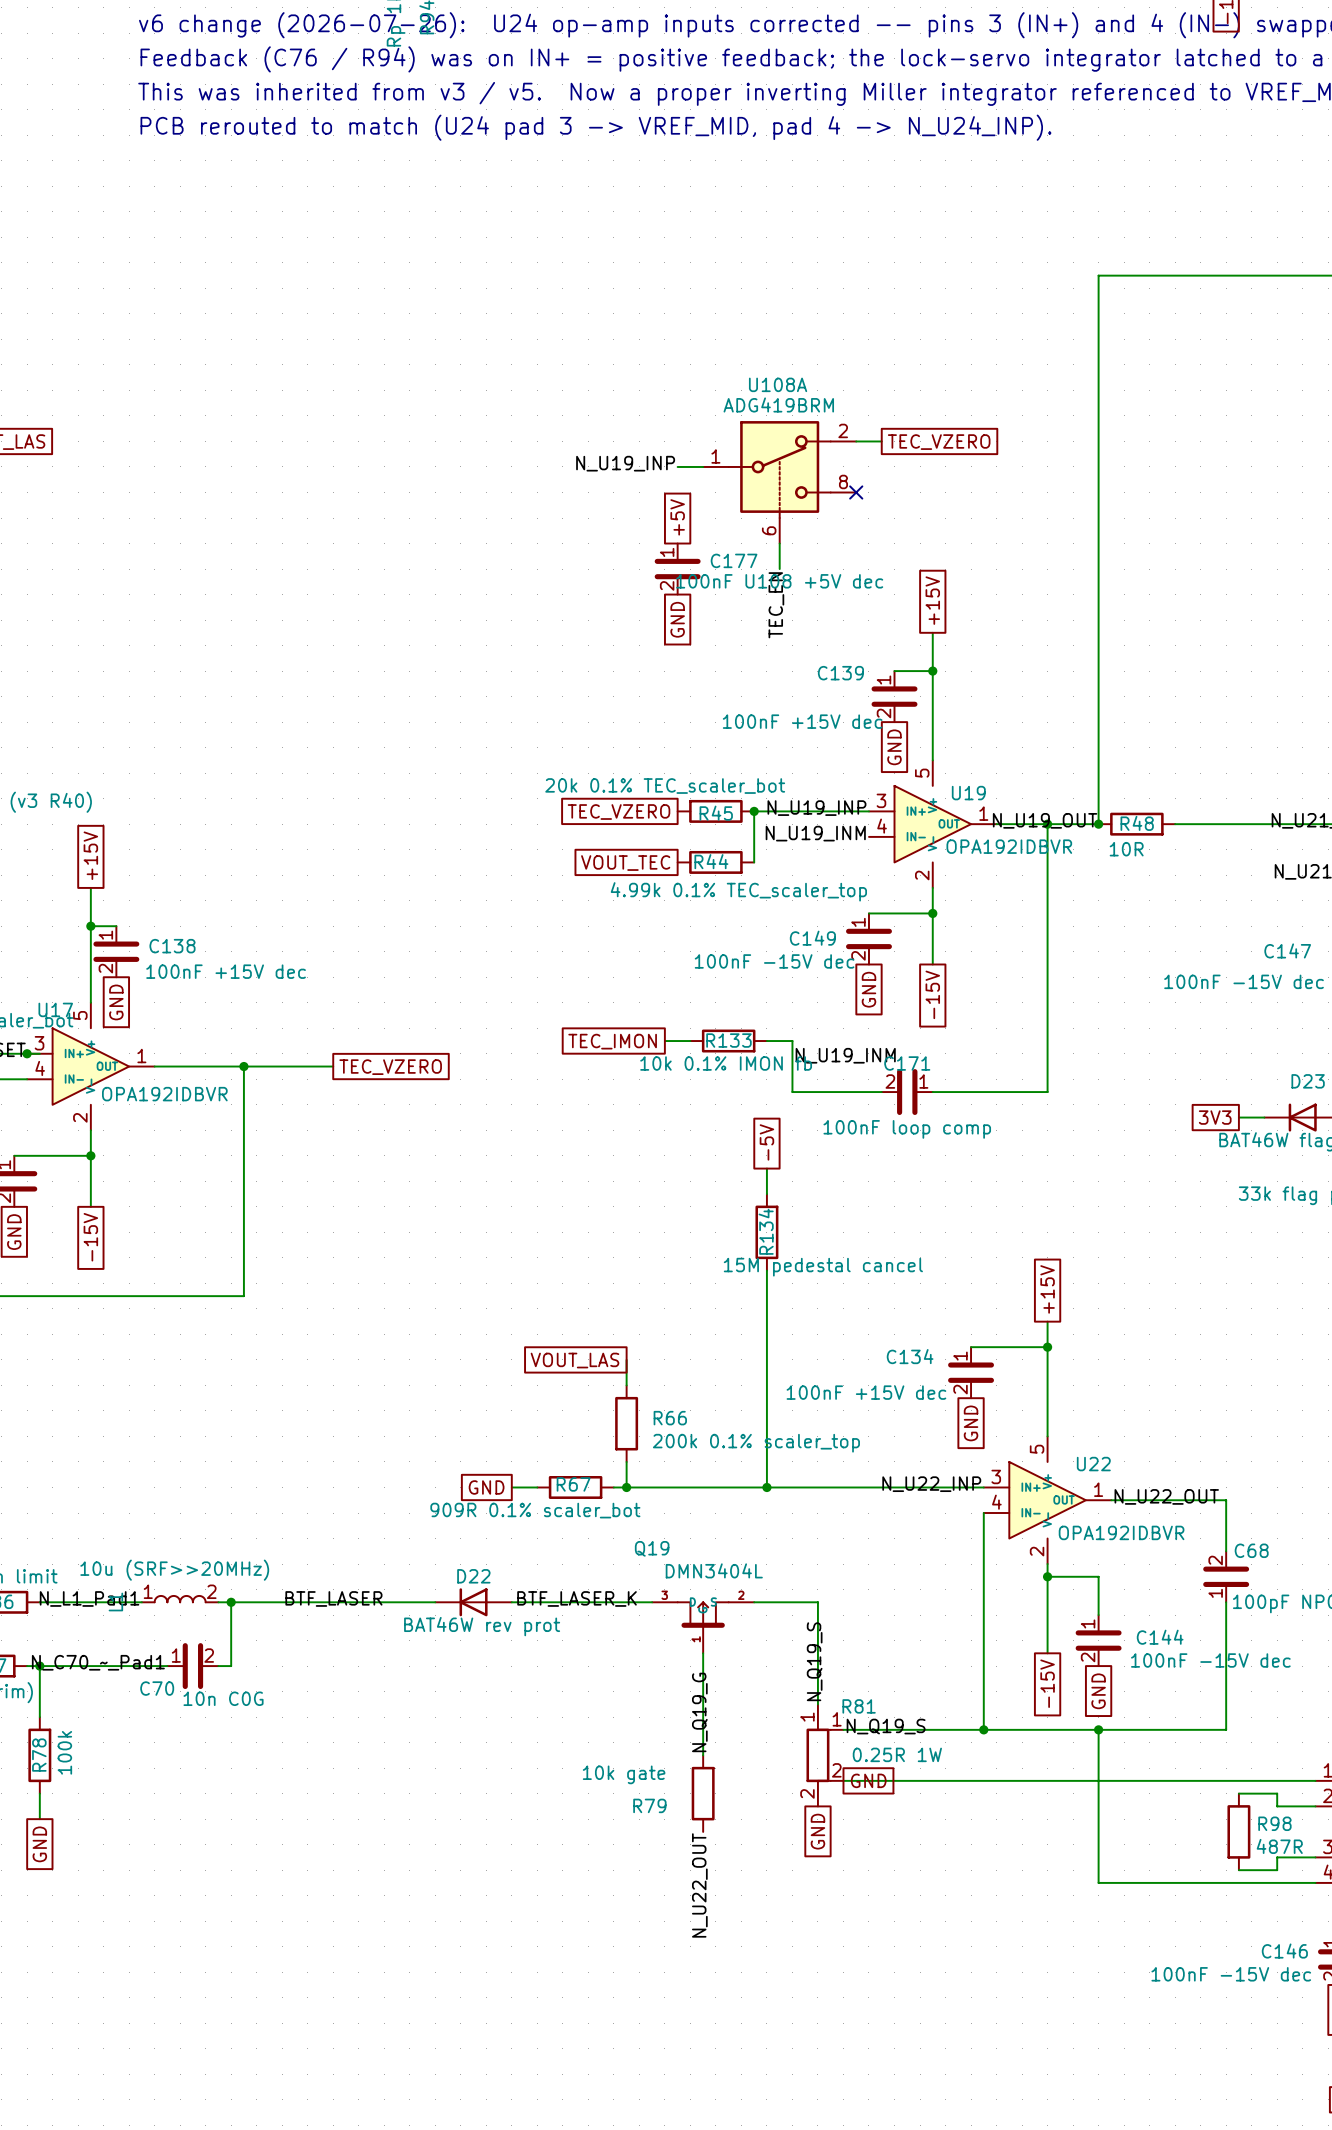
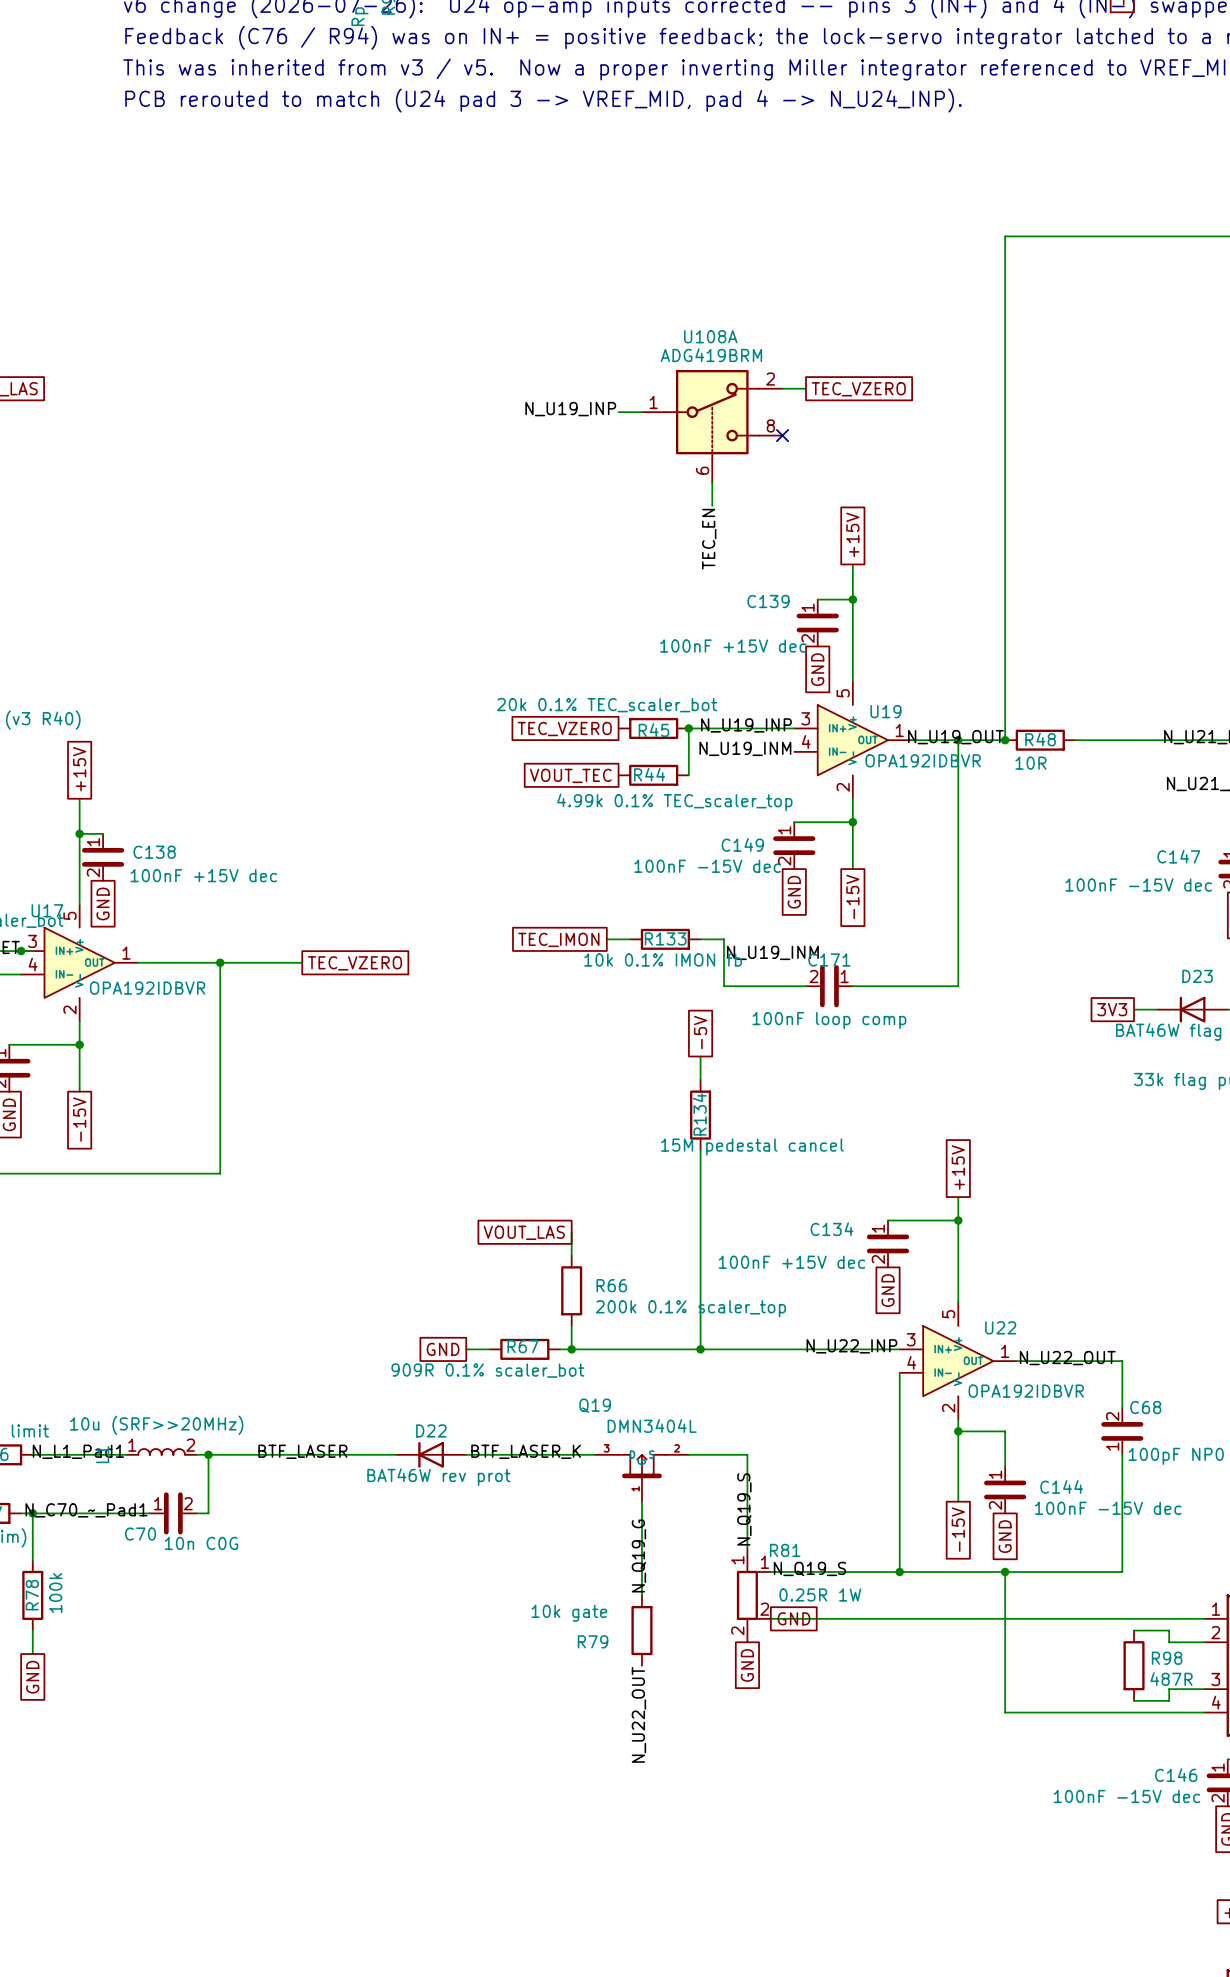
global label: +5V (677, 517) -> none
C177: 100nF U108 +5V dec (677, 569) -> none
global label: GND (677, 619) -> none

